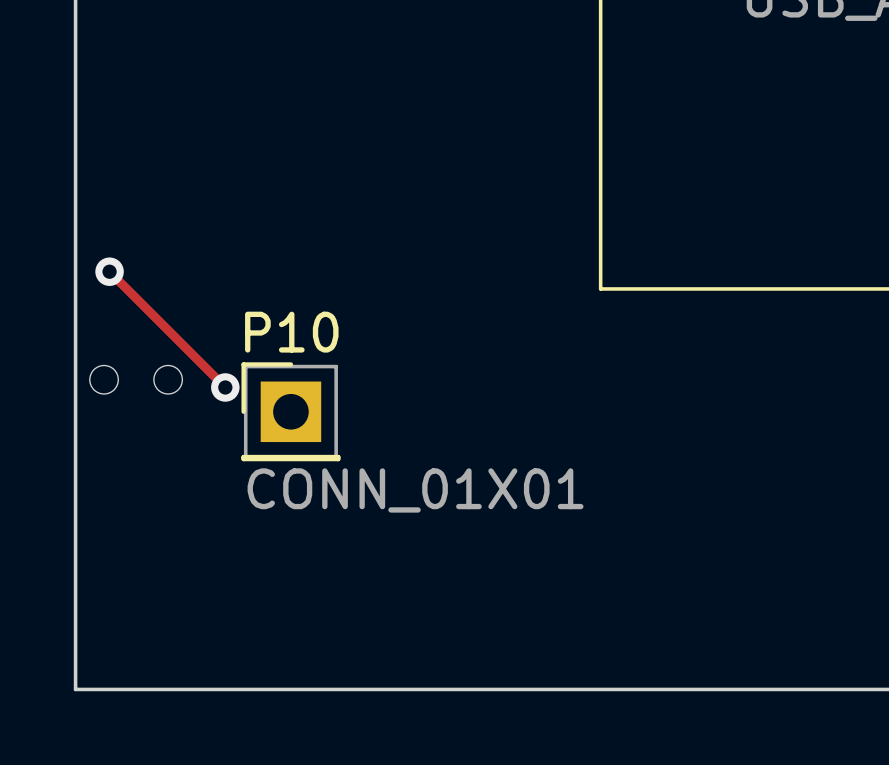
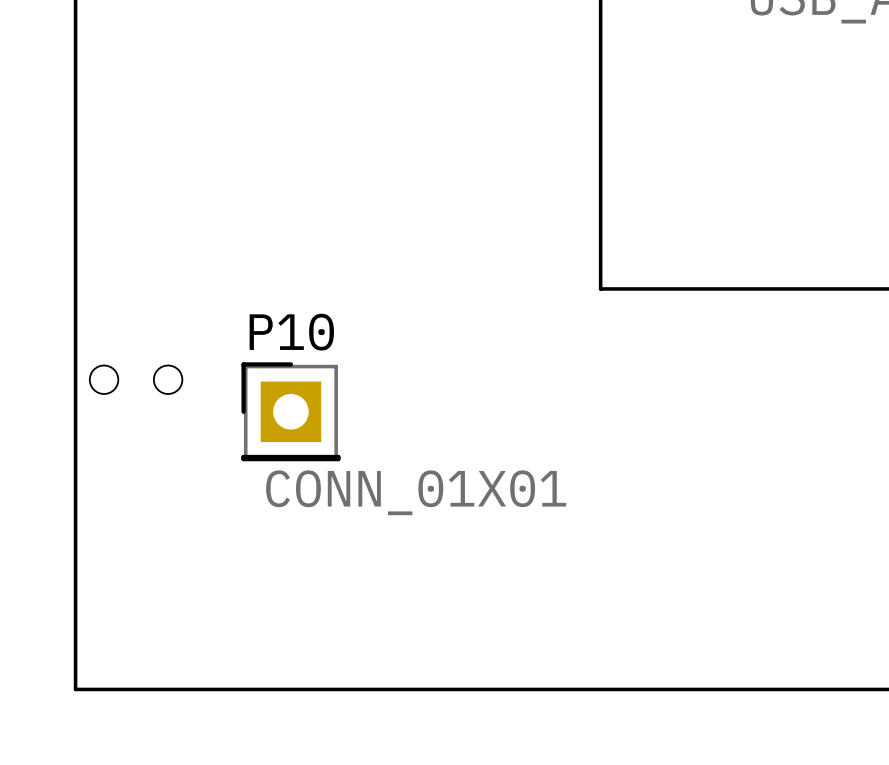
track: (109, 271) (225, 387) -> none
via: (109, 271) -> none
via: (225, 387) -> none

